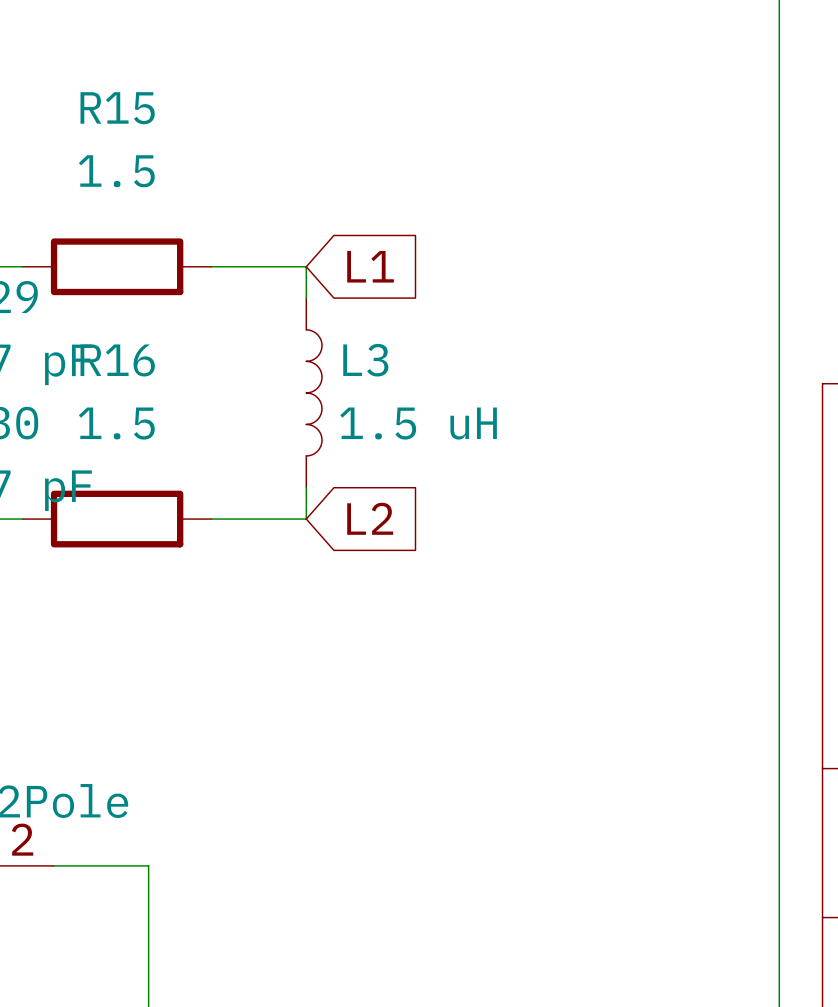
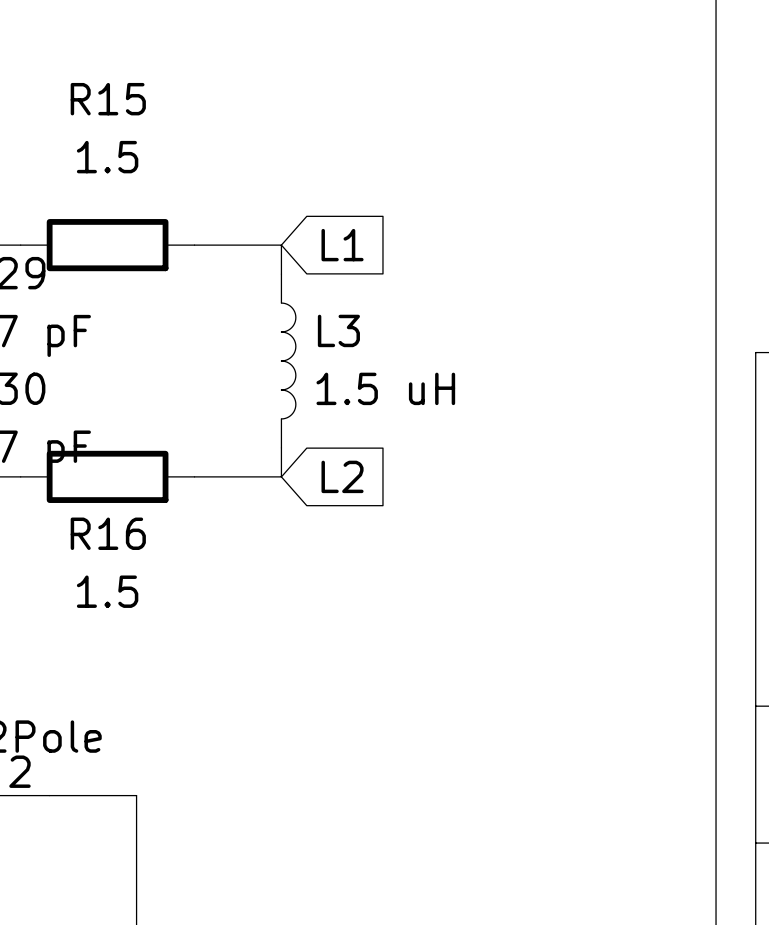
R16 name position: R16 (117, 360) -> R16 (108, 533)
R16 value position: 1.5 (116, 423) -> 1.5 (107, 591)

